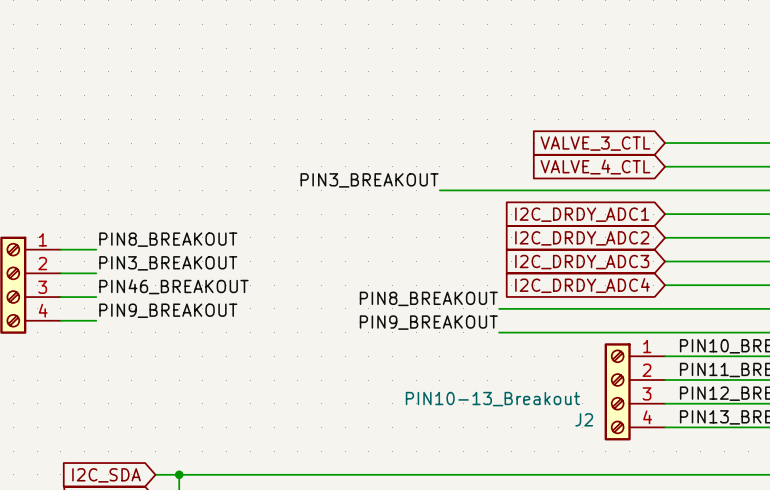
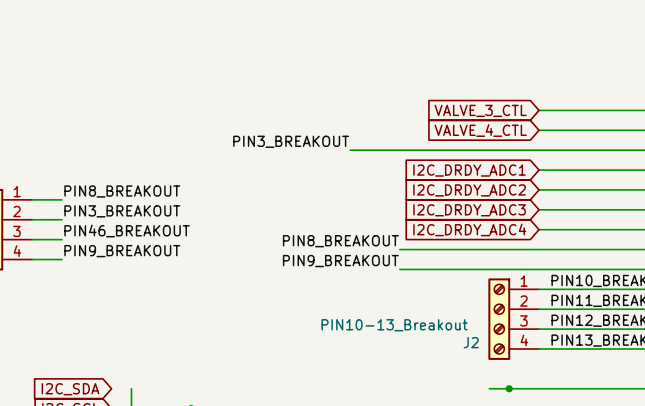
wire: (155, 474) (605, 474) -> none
junction: (179, 474) -> none
junction: none -> (509, 388)

